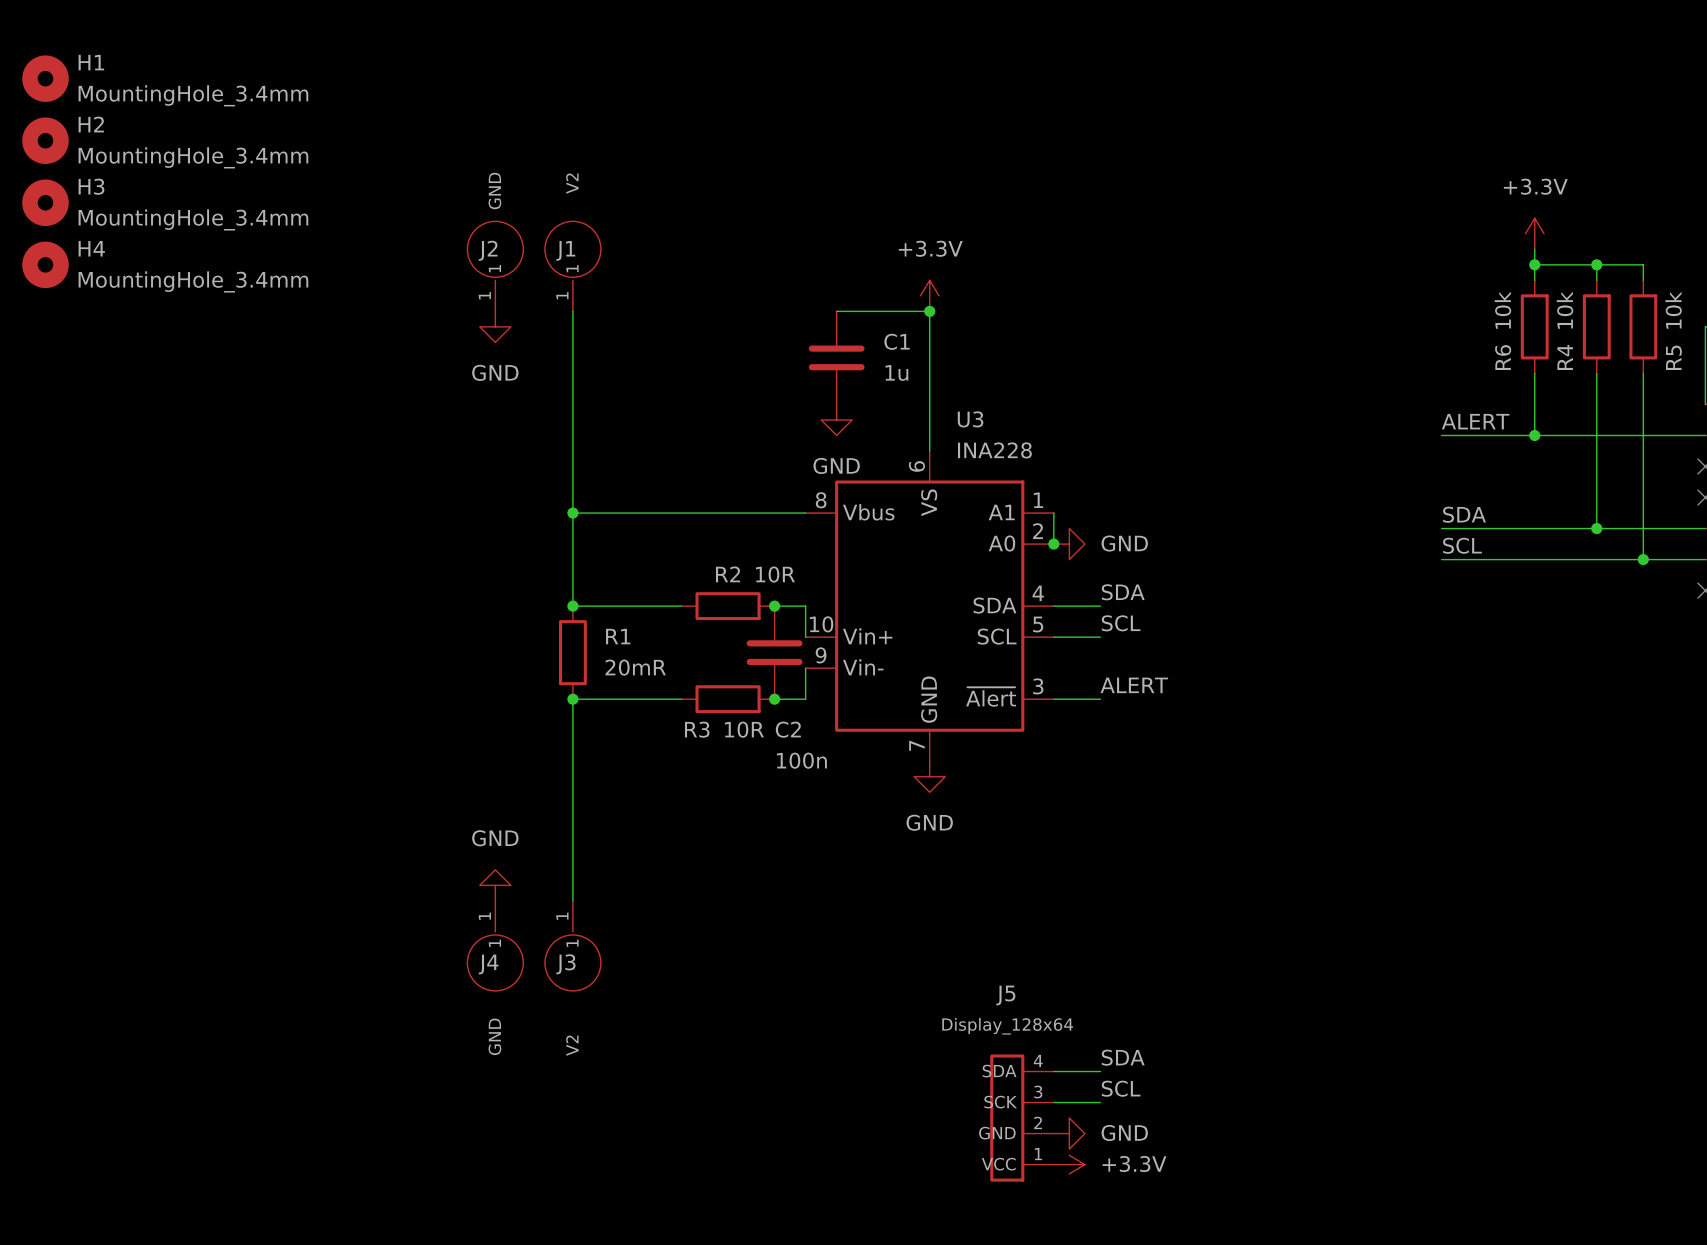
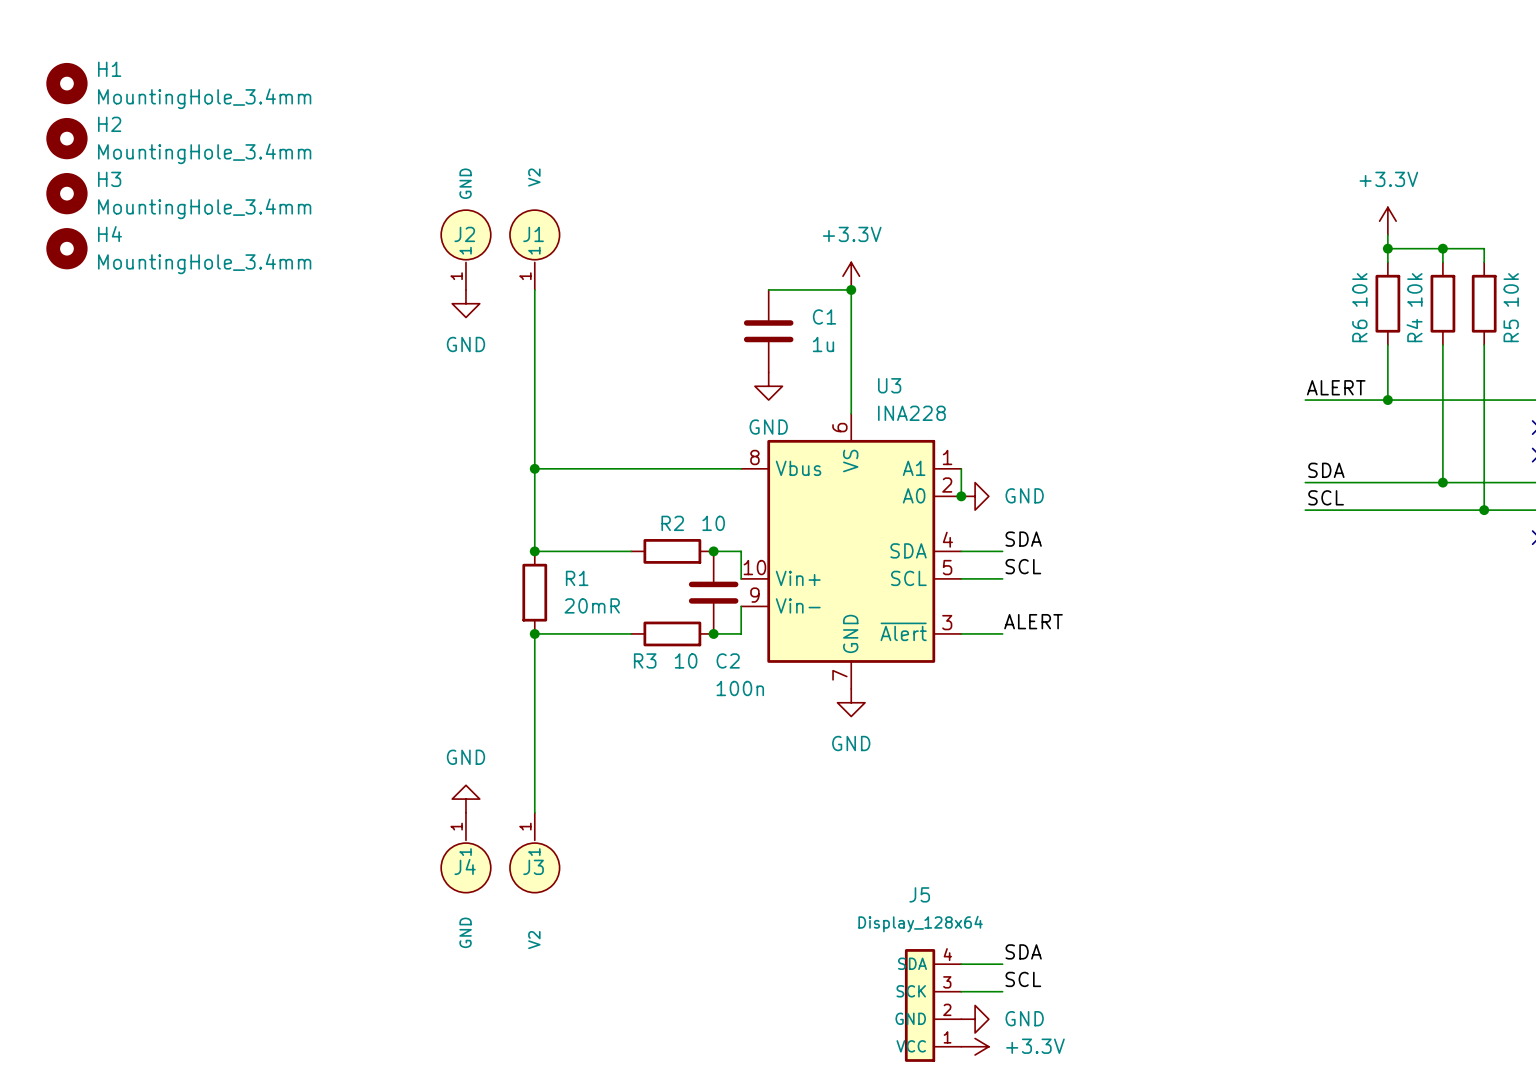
R2 value: 10R (775, 574) -> 10 (713, 523)
R3 value: 10R (744, 729) -> 10 (686, 660)

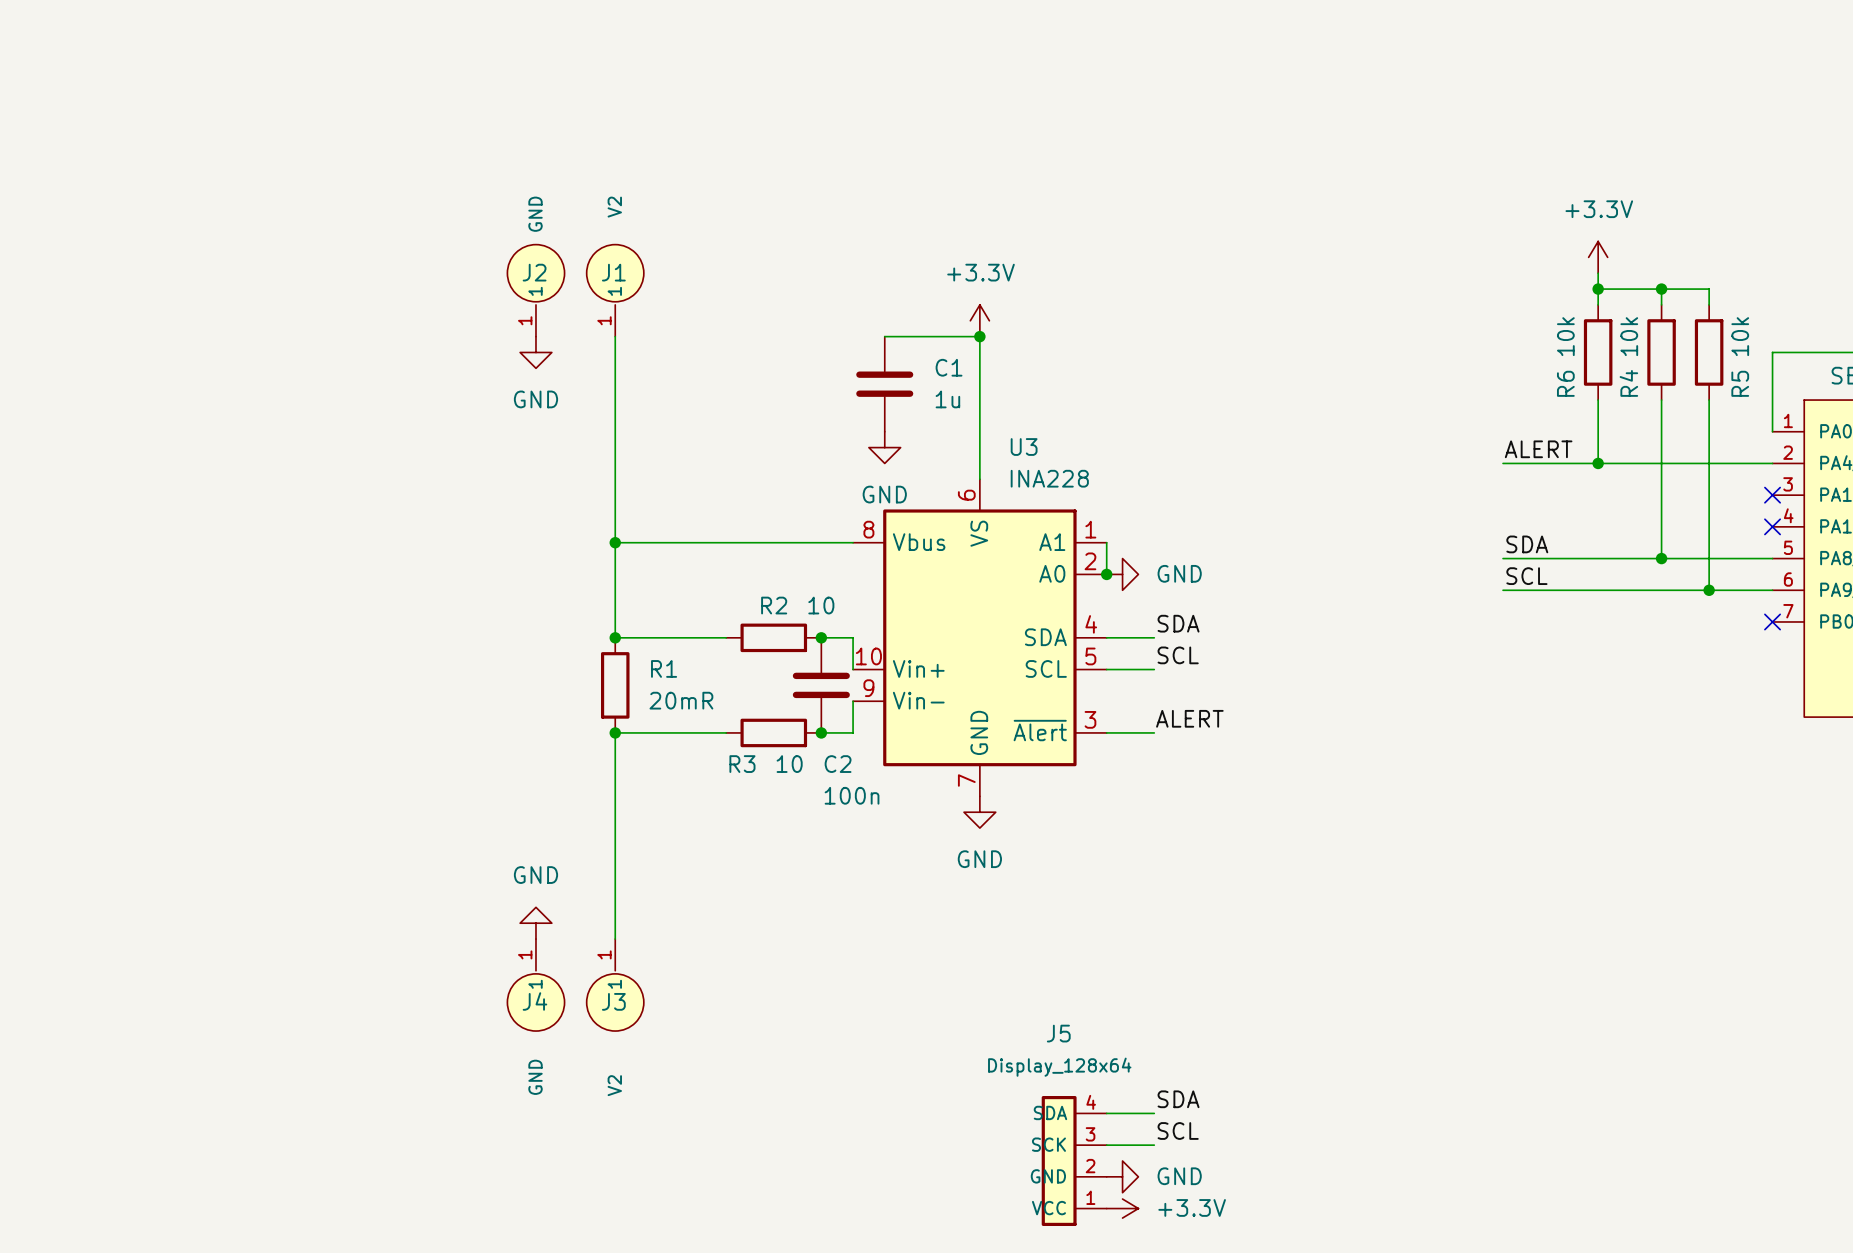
H1: MountingHole_3.4mm (66, 83) -> none
H2: MountingHole_3.4mm (66, 138) -> none
H3: MountingHole_3.4mm (66, 193) -> none
H4: MountingHole_3.4mm (66, 248) -> none

